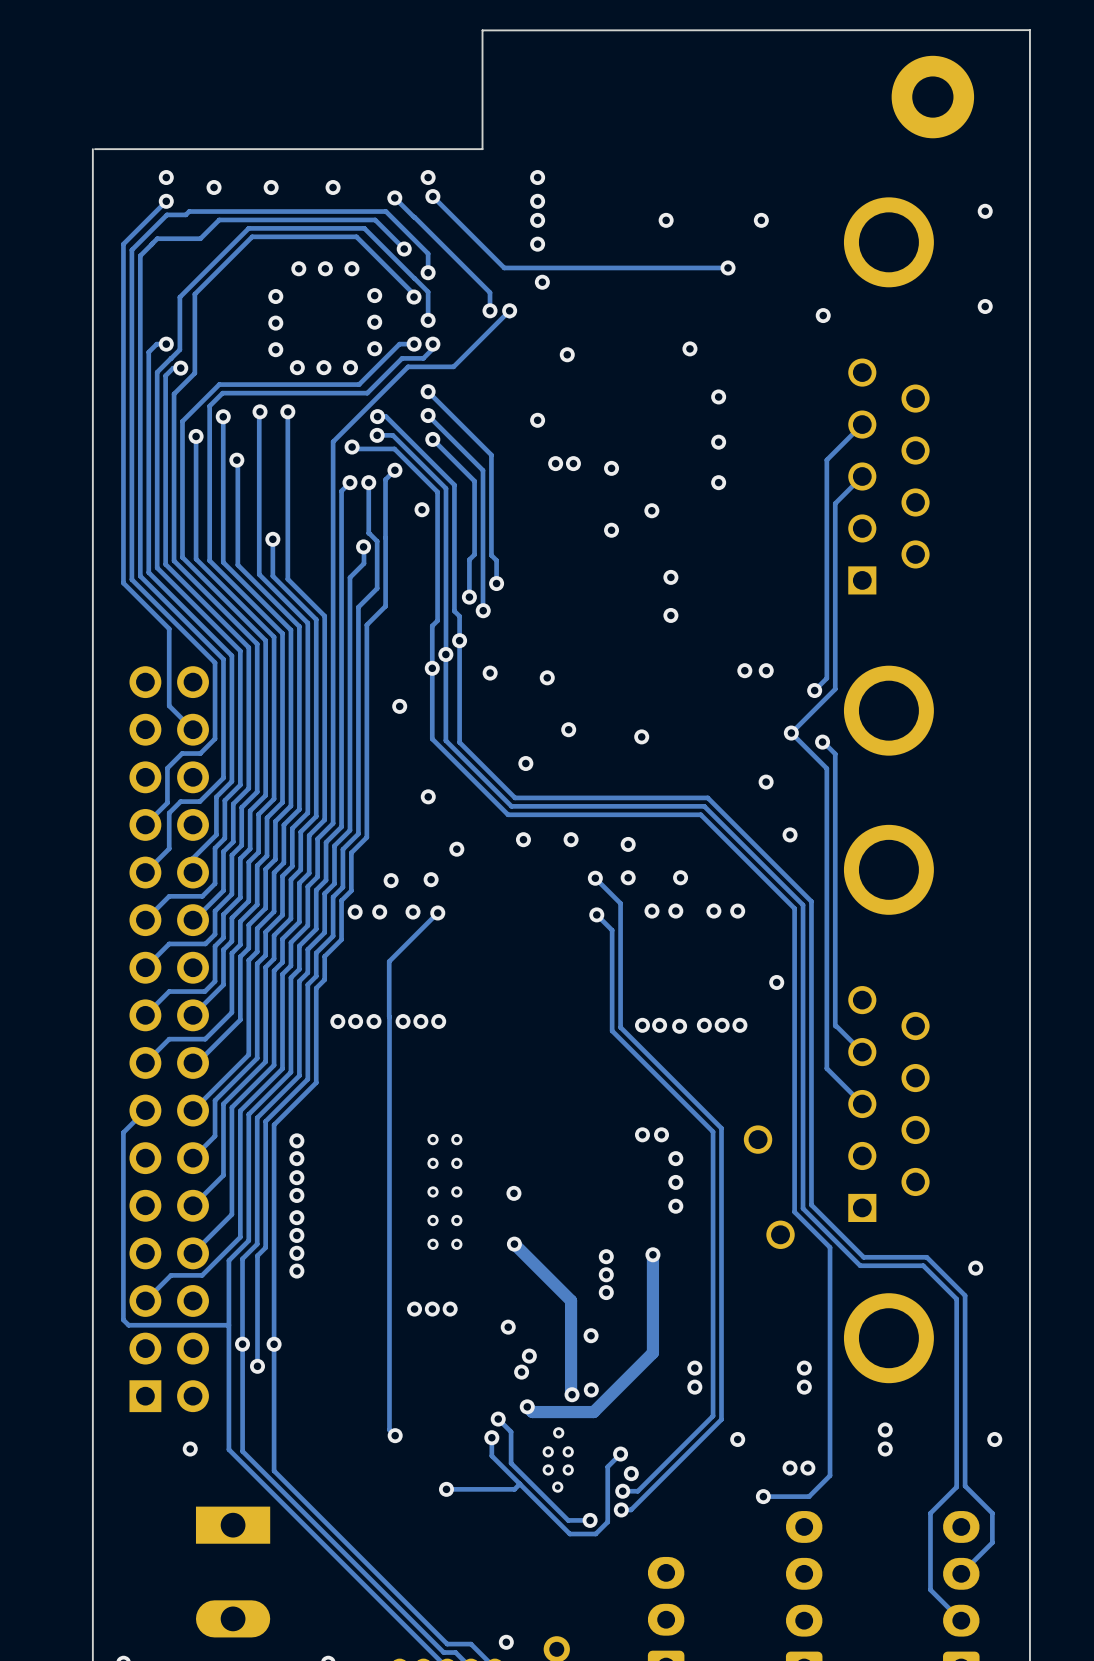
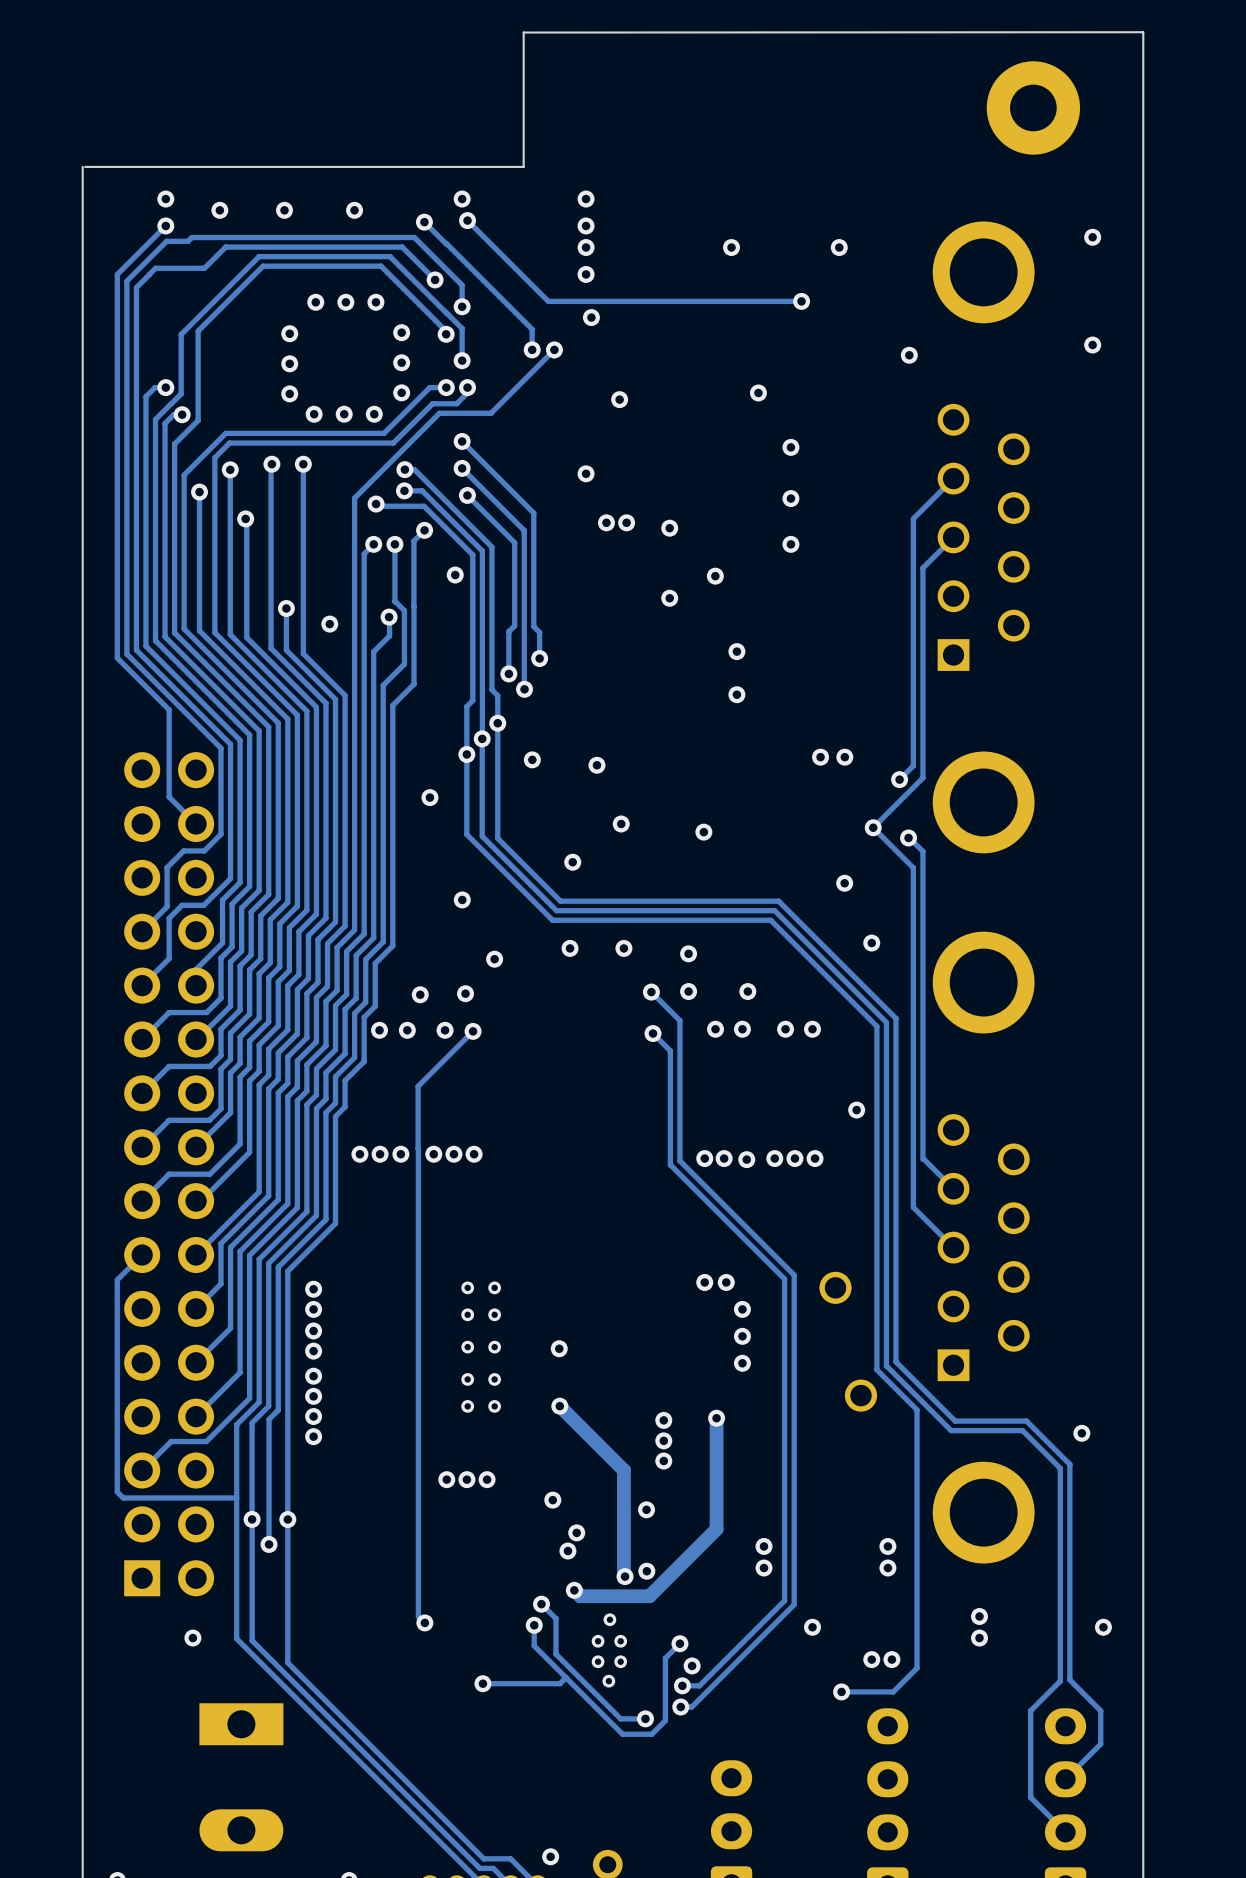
via: none -> (329, 624)

